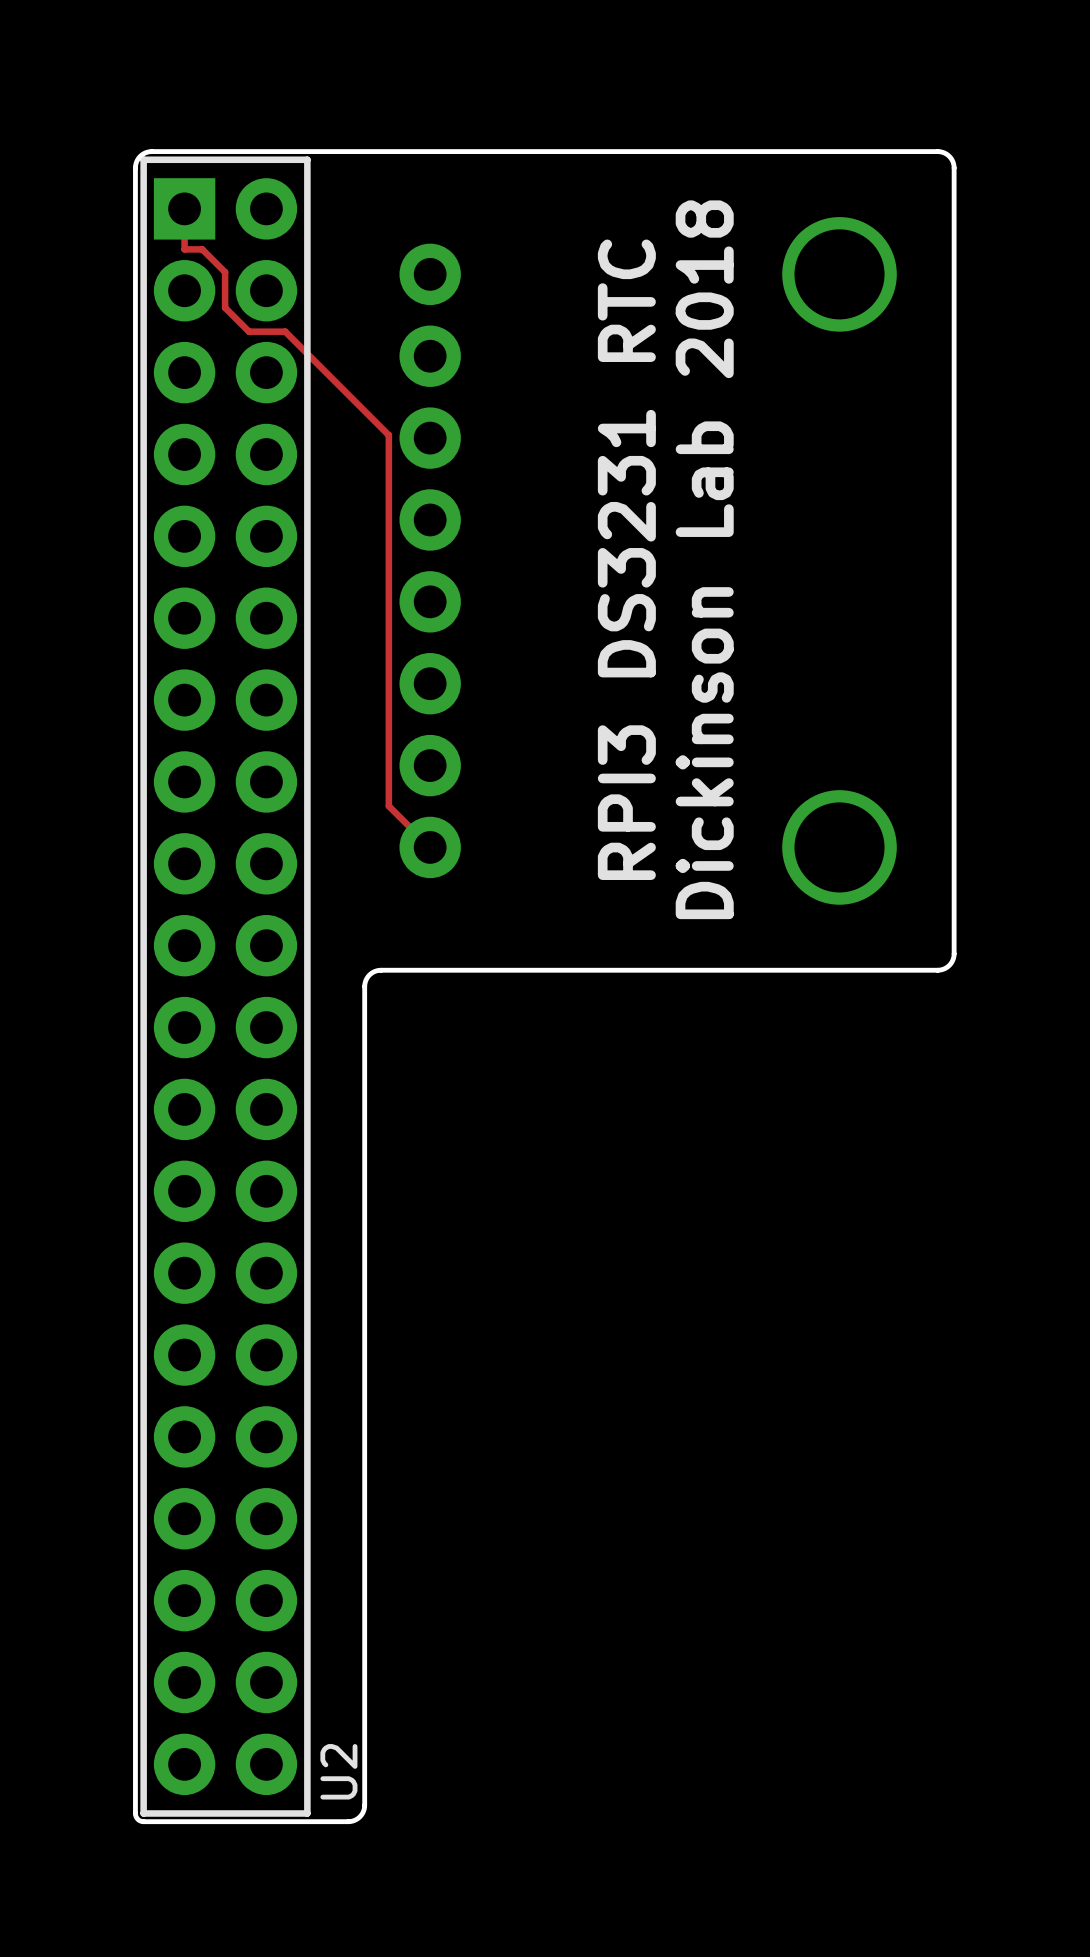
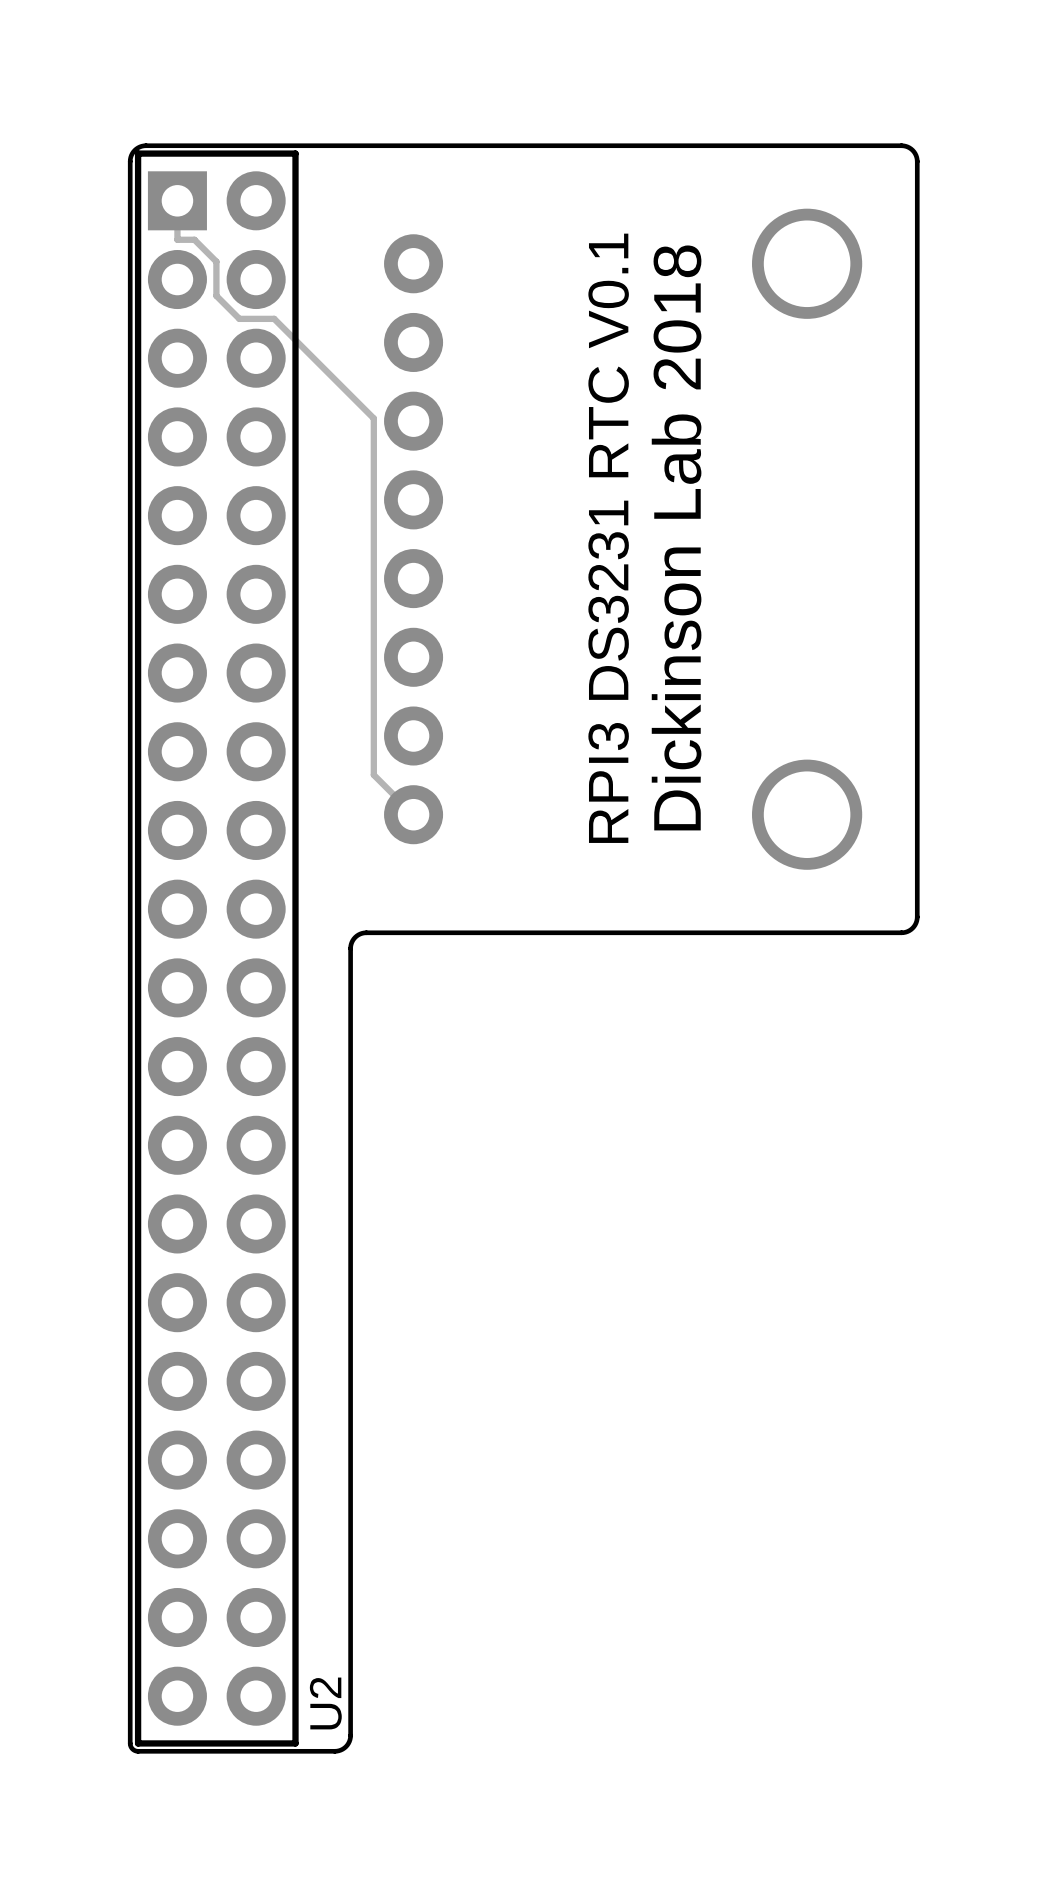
text: RPI3 DS3231 RTC (626, 559) -> RPI3 DS3231 RTC V0.1 (608, 538)

